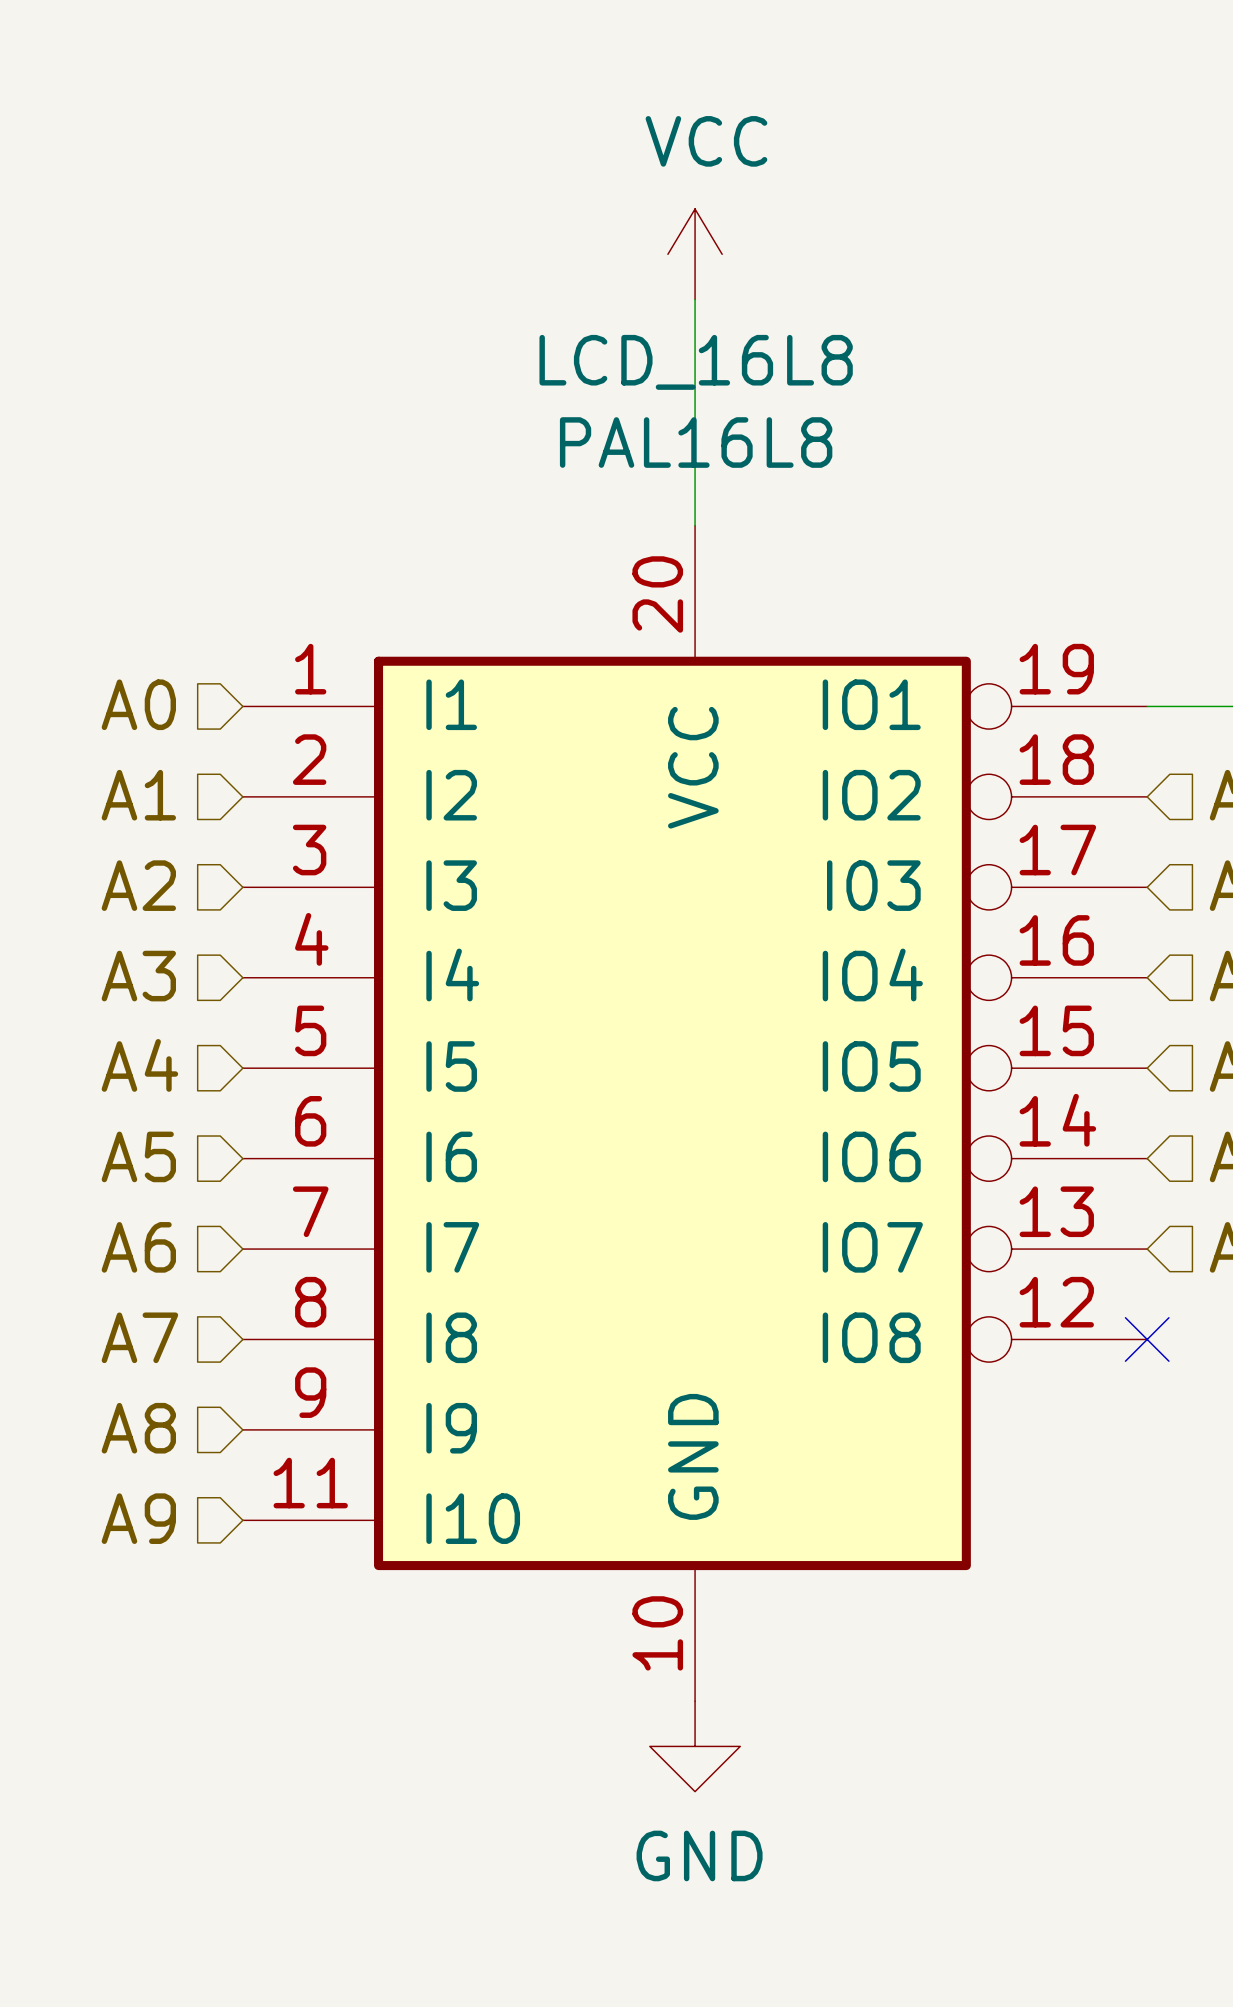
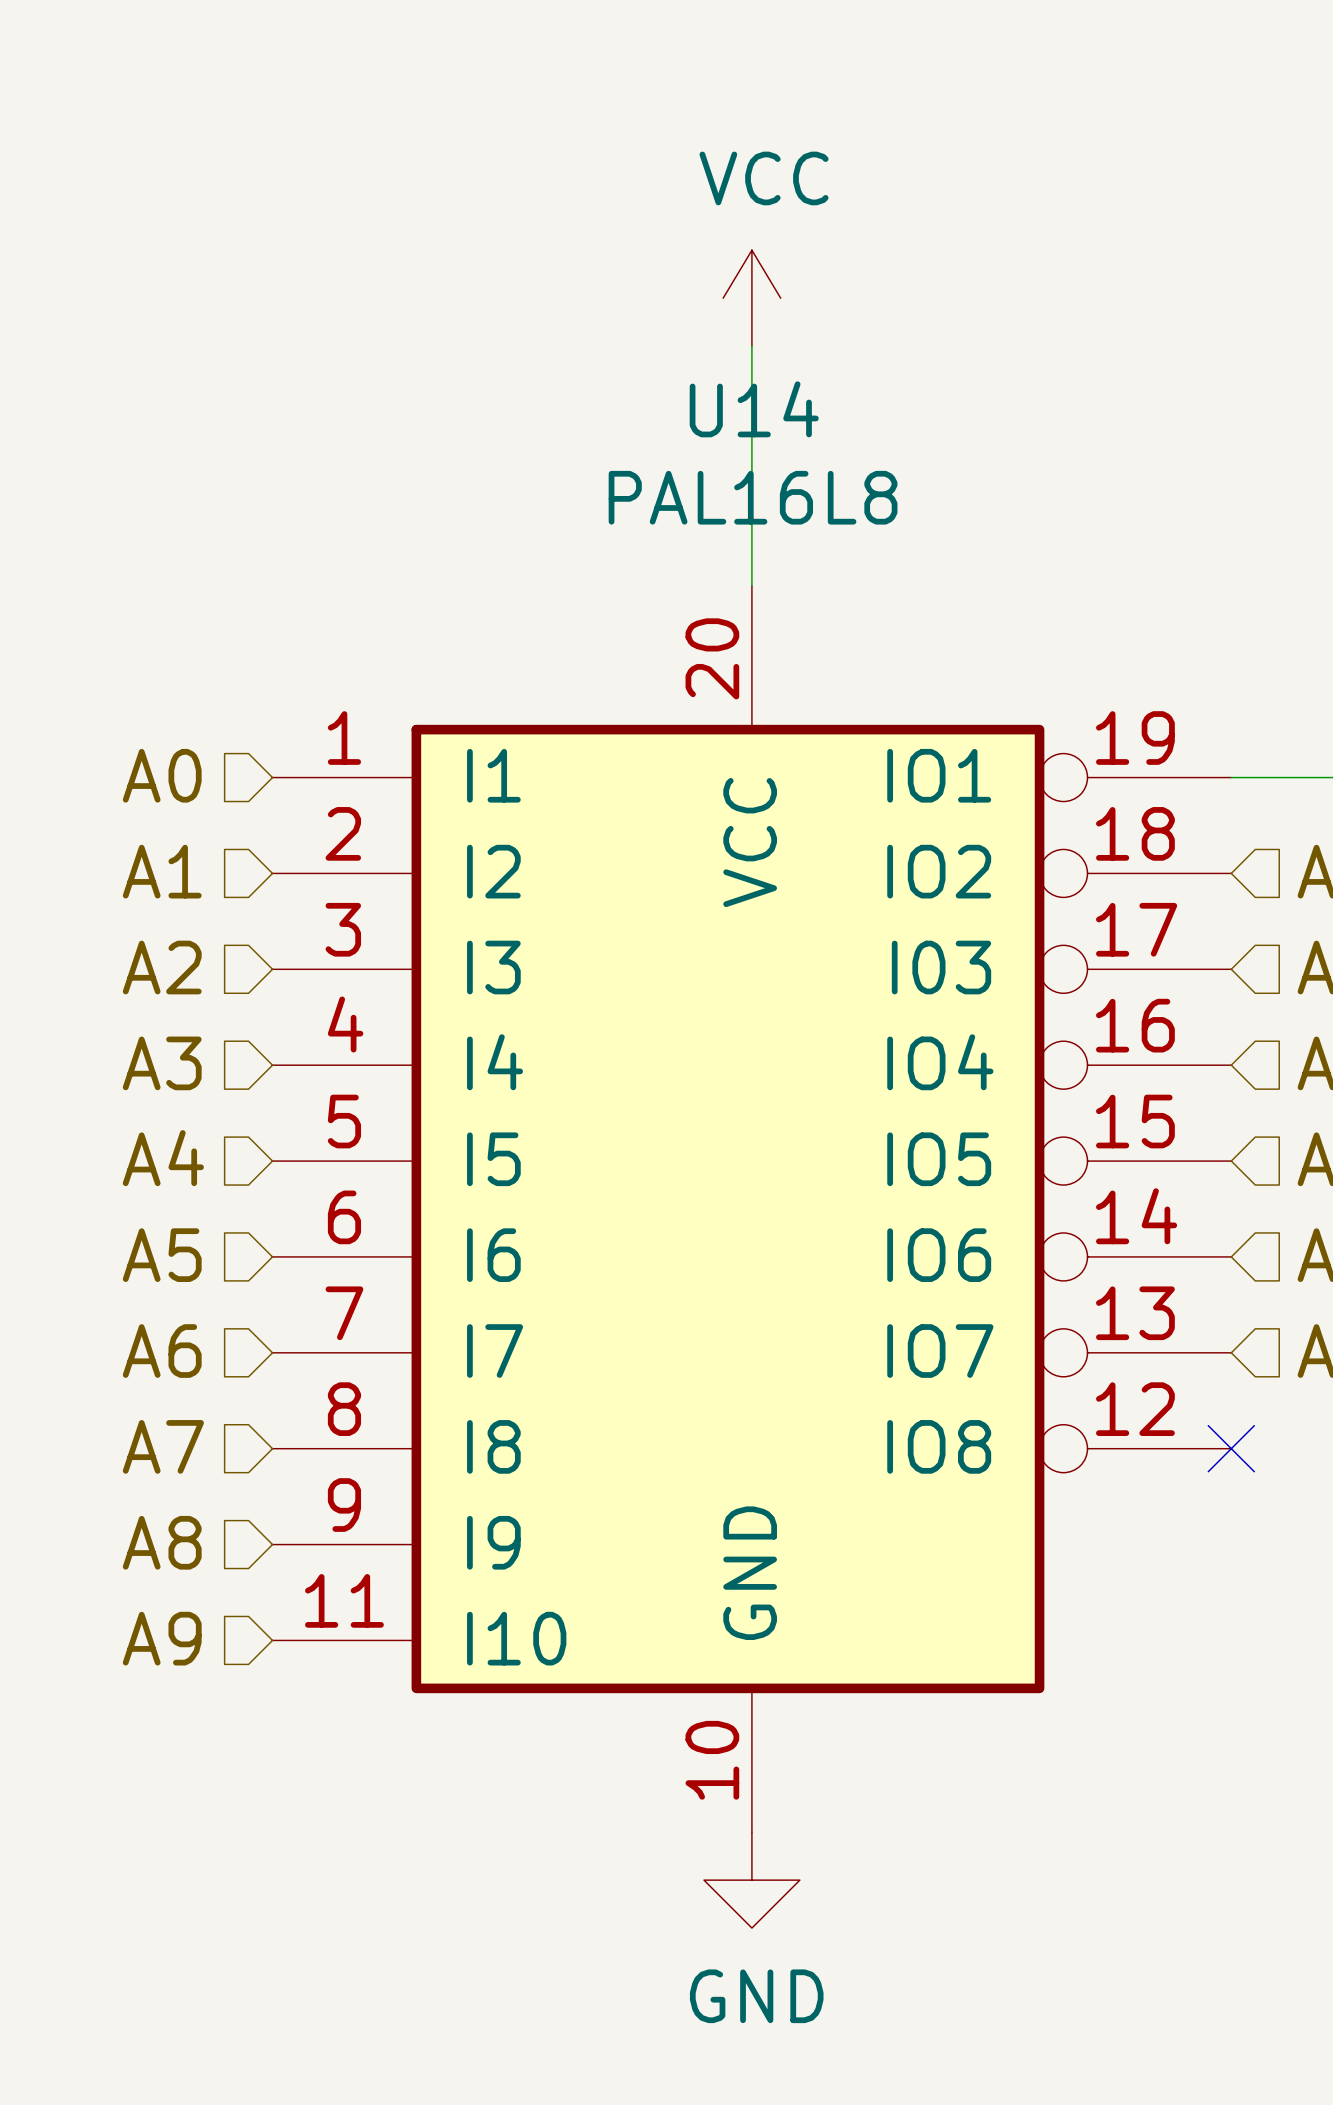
LCD_16L8 name: LCD_16L8 (696, 362) -> U14 (754, 409)

